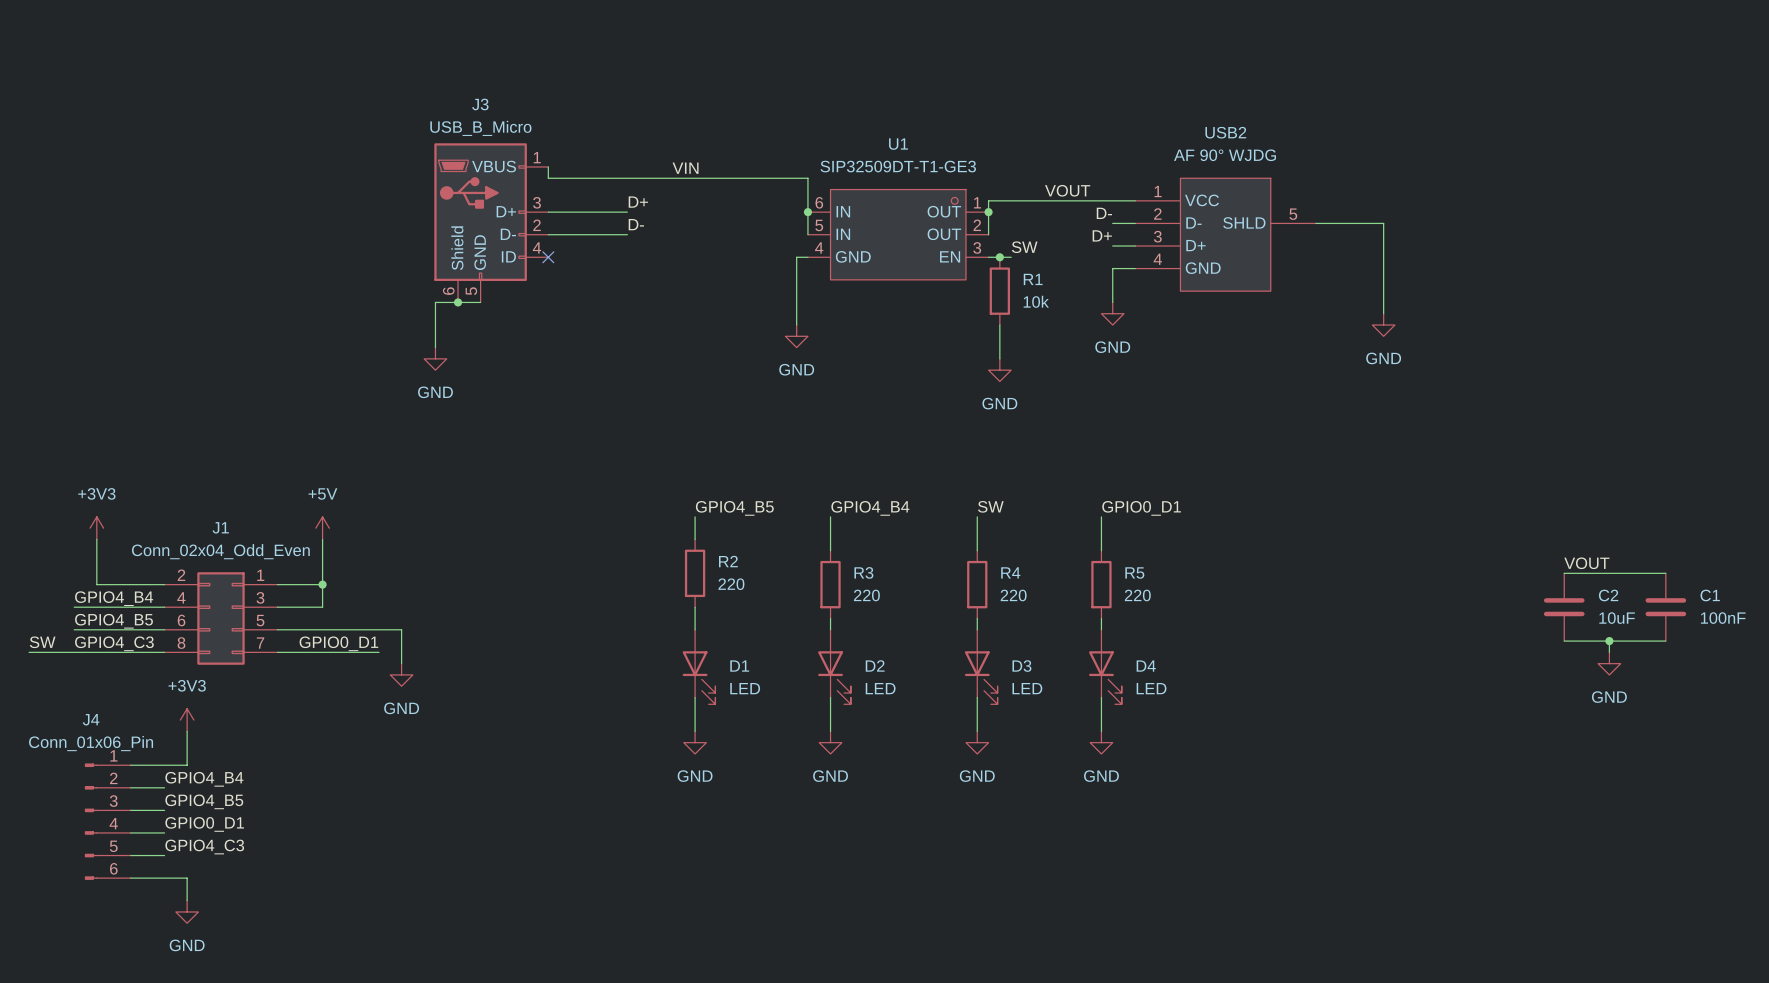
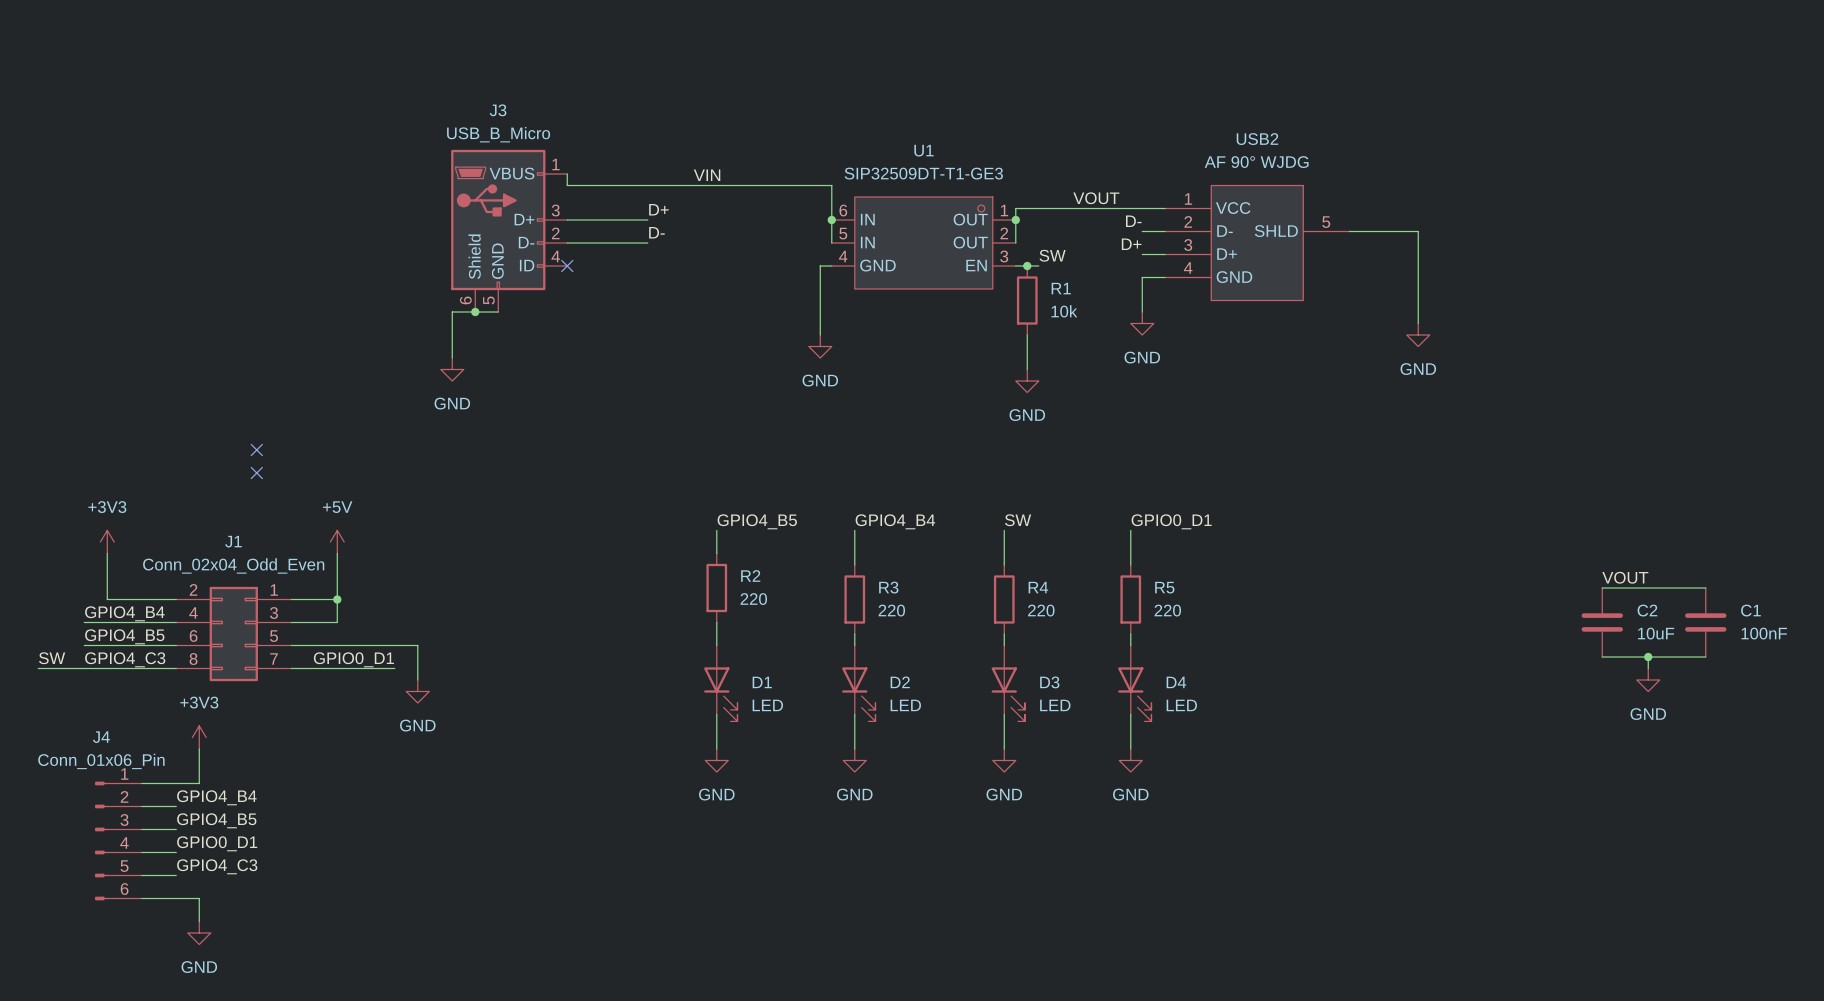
no-connect mark: none -> (256, 450)
no-connect mark: none -> (256, 473)

